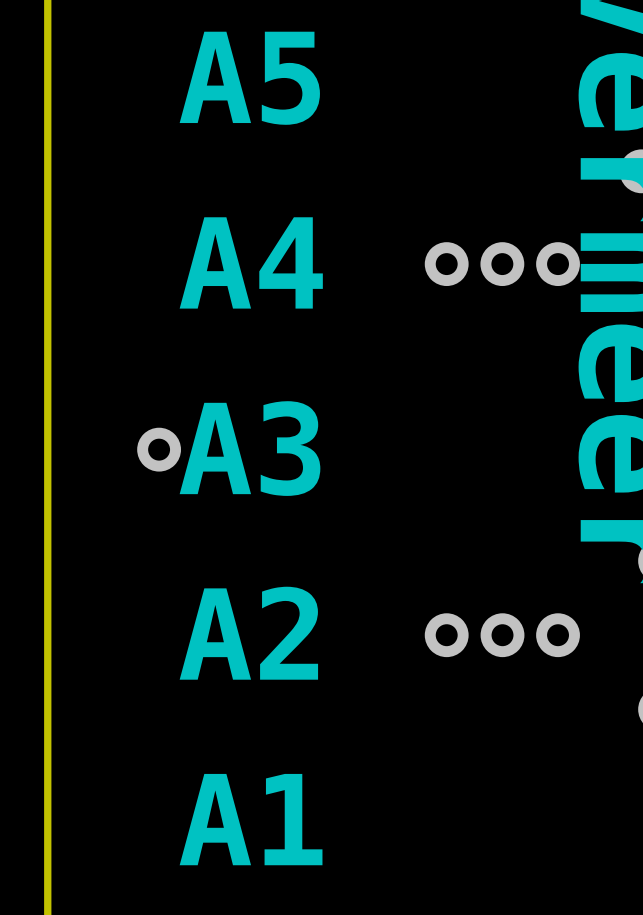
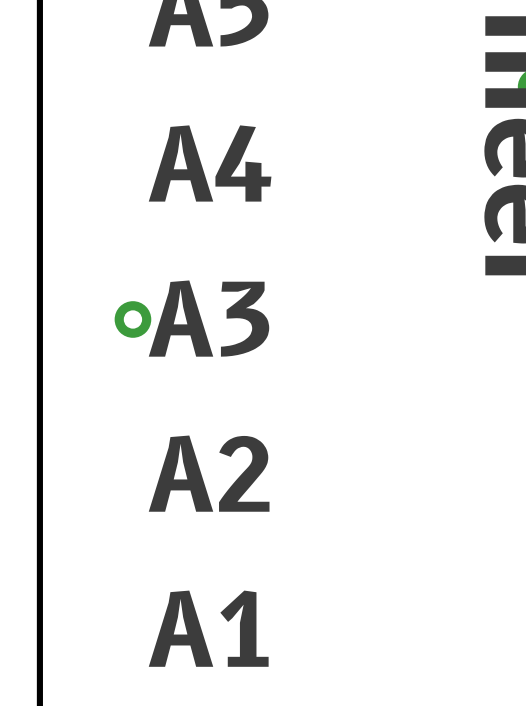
via: (446, 264) -> none
via: (502, 264) -> none
via: (558, 264) -> none
via: (446, 635) -> none
via: (502, 635) -> none
via: (558, 635) -> none

